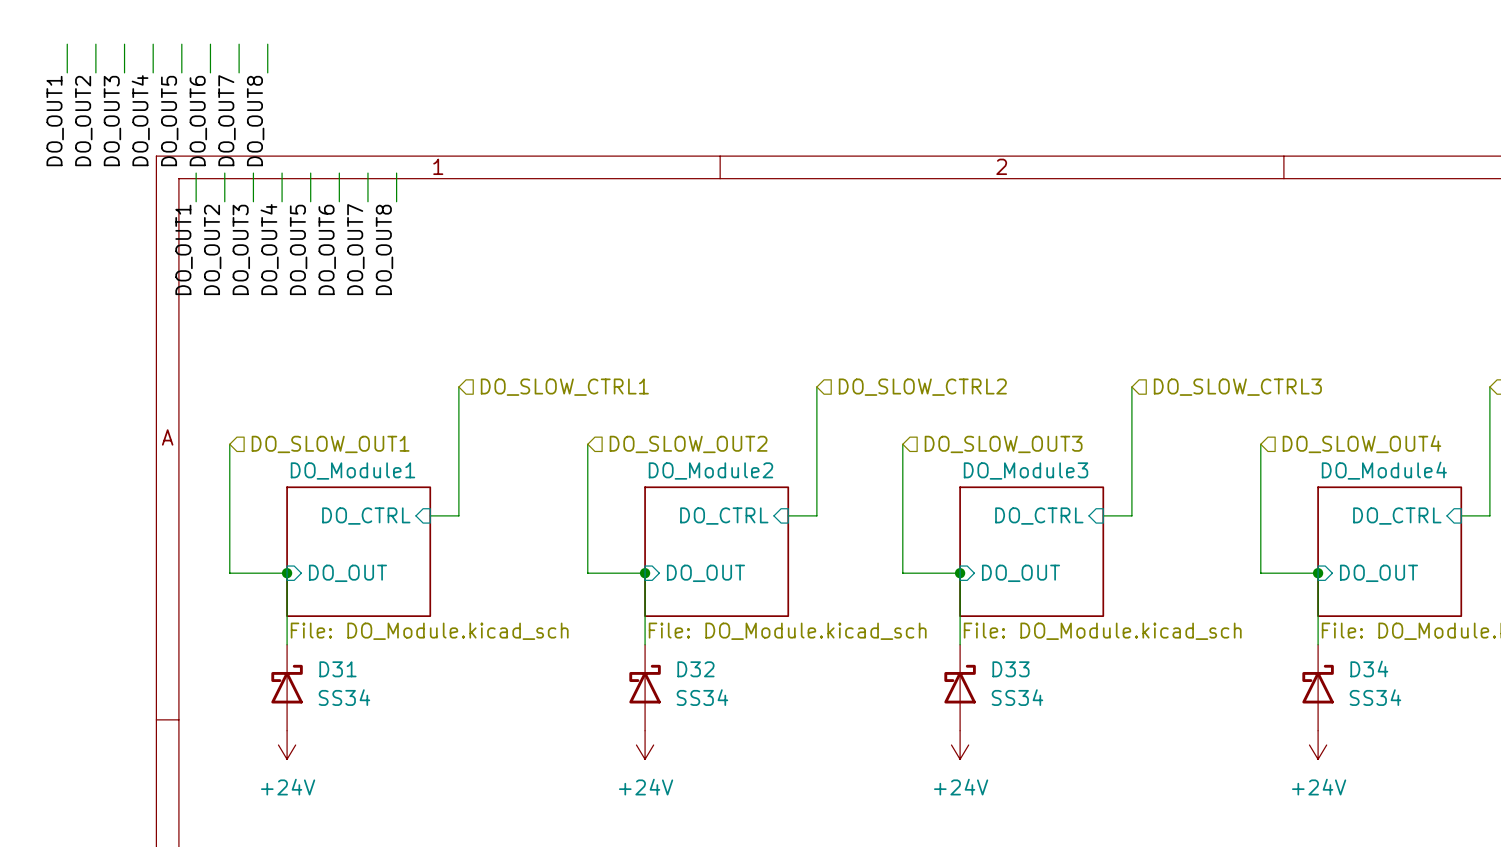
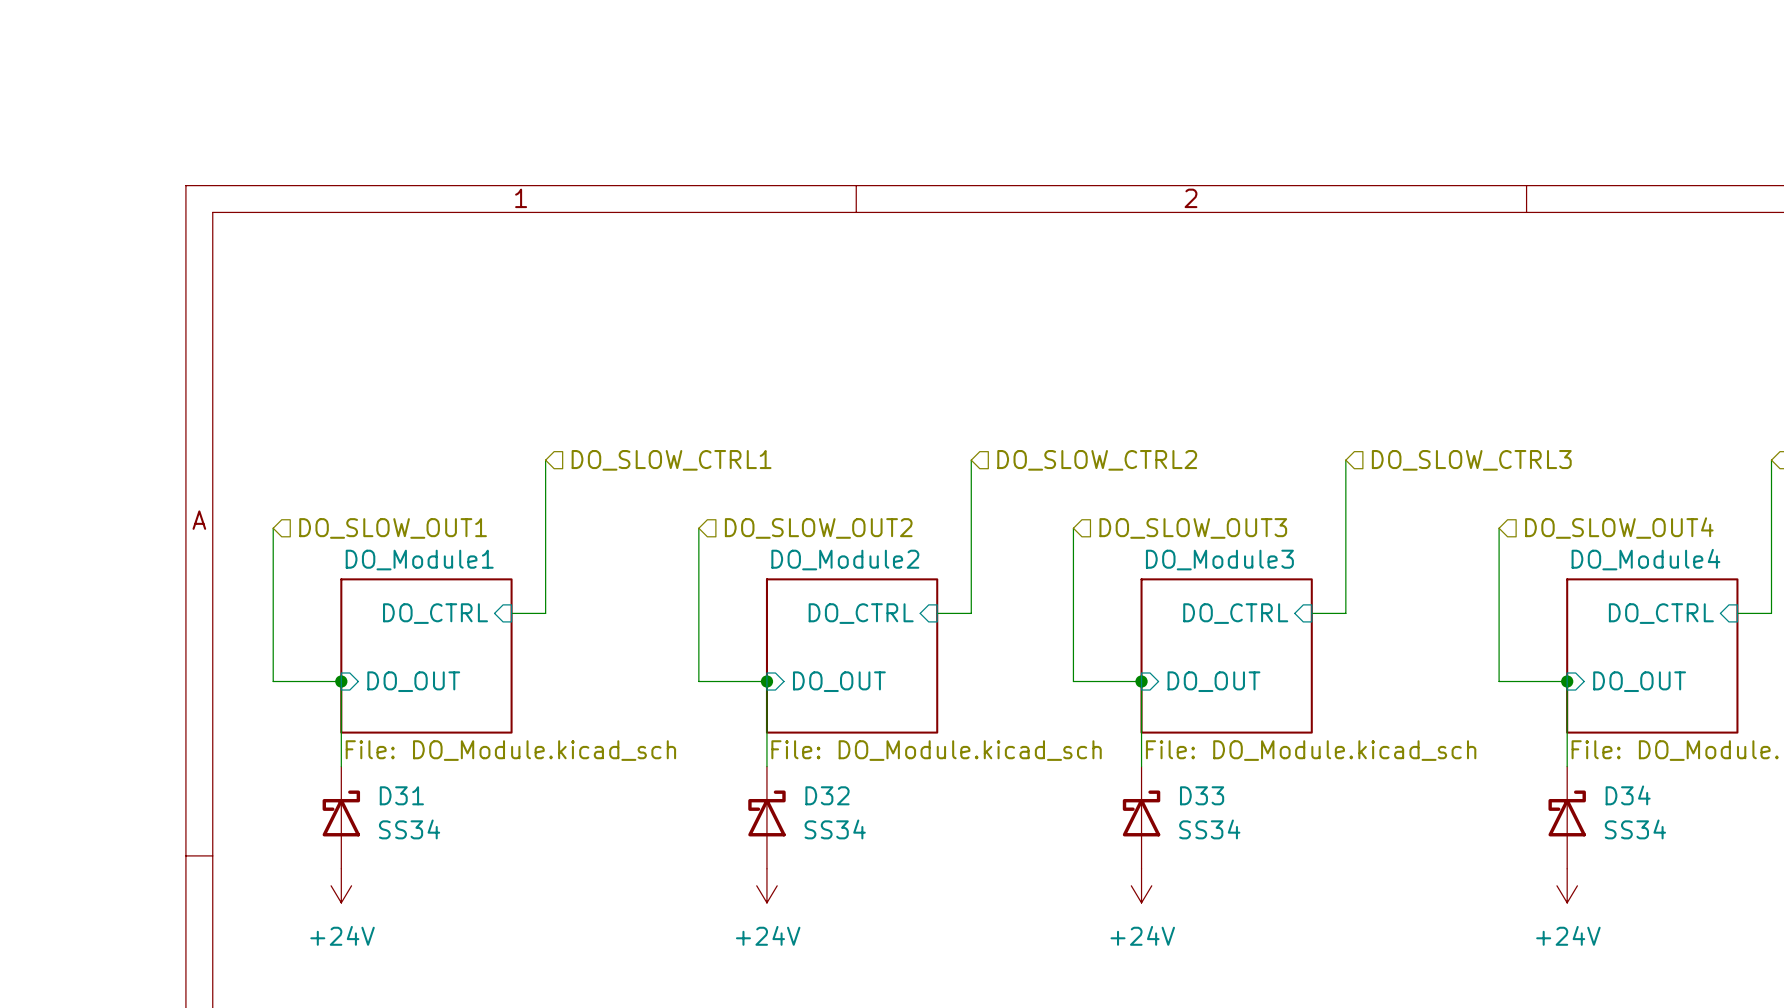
wire: (67, 44) (67, 72) -> none
wire: (95, 44) (95, 72) -> none
wire: (124, 44) (124, 72) -> none
wire: (153, 44) (153, 72) -> none
wire: (181, 44) (181, 72) -> none
wire: (210, 44) (210, 72) -> none
wire: (239, 44) (239, 72) -> none
wire: (267, 44) (267, 72) -> none
label: DO_OUT4 (140, 120) -> none
label: DO_OUT7 (227, 120) -> none
label: DO_OUT1 (55, 121) -> none
label: DO_OUT2 (83, 121) -> none
label: DO_OUT3 (112, 121) -> none
label: DO_OUT5 (169, 121) -> none
label: DO_OUT6 (198, 121) -> none
label: DO_OUT8 (255, 121) -> none
wire: (196, 173) (196, 201) -> none
wire: (224, 173) (224, 201) -> none
wire: (253, 173) (253, 201) -> none
wire: (282, 173) (282, 201) -> none
wire: (310, 173) (310, 201) -> none
wire: (339, 173) (339, 201) -> none
wire: (367, 173) (367, 201) -> none
wire: (396, 173) (396, 201) -> none
label: DO_OUT1 (184, 249) -> none
label: DO_OUT2 (212, 249) -> none
label: DO_OUT3 (241, 249) -> none
label: DO_OUT4 (269, 249) -> none
label: DO_OUT5 (298, 249) -> none
label: DO_OUT6 (327, 249) -> none
label: DO_OUT7 (355, 249) -> none
label: DO_OUT8 (384, 249) -> none

